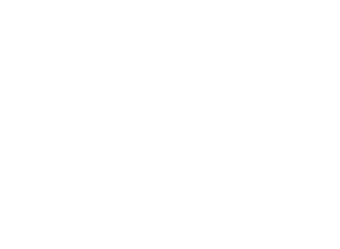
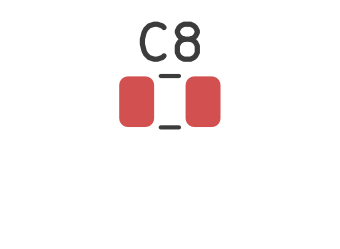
C8: none -> (169, 101)

